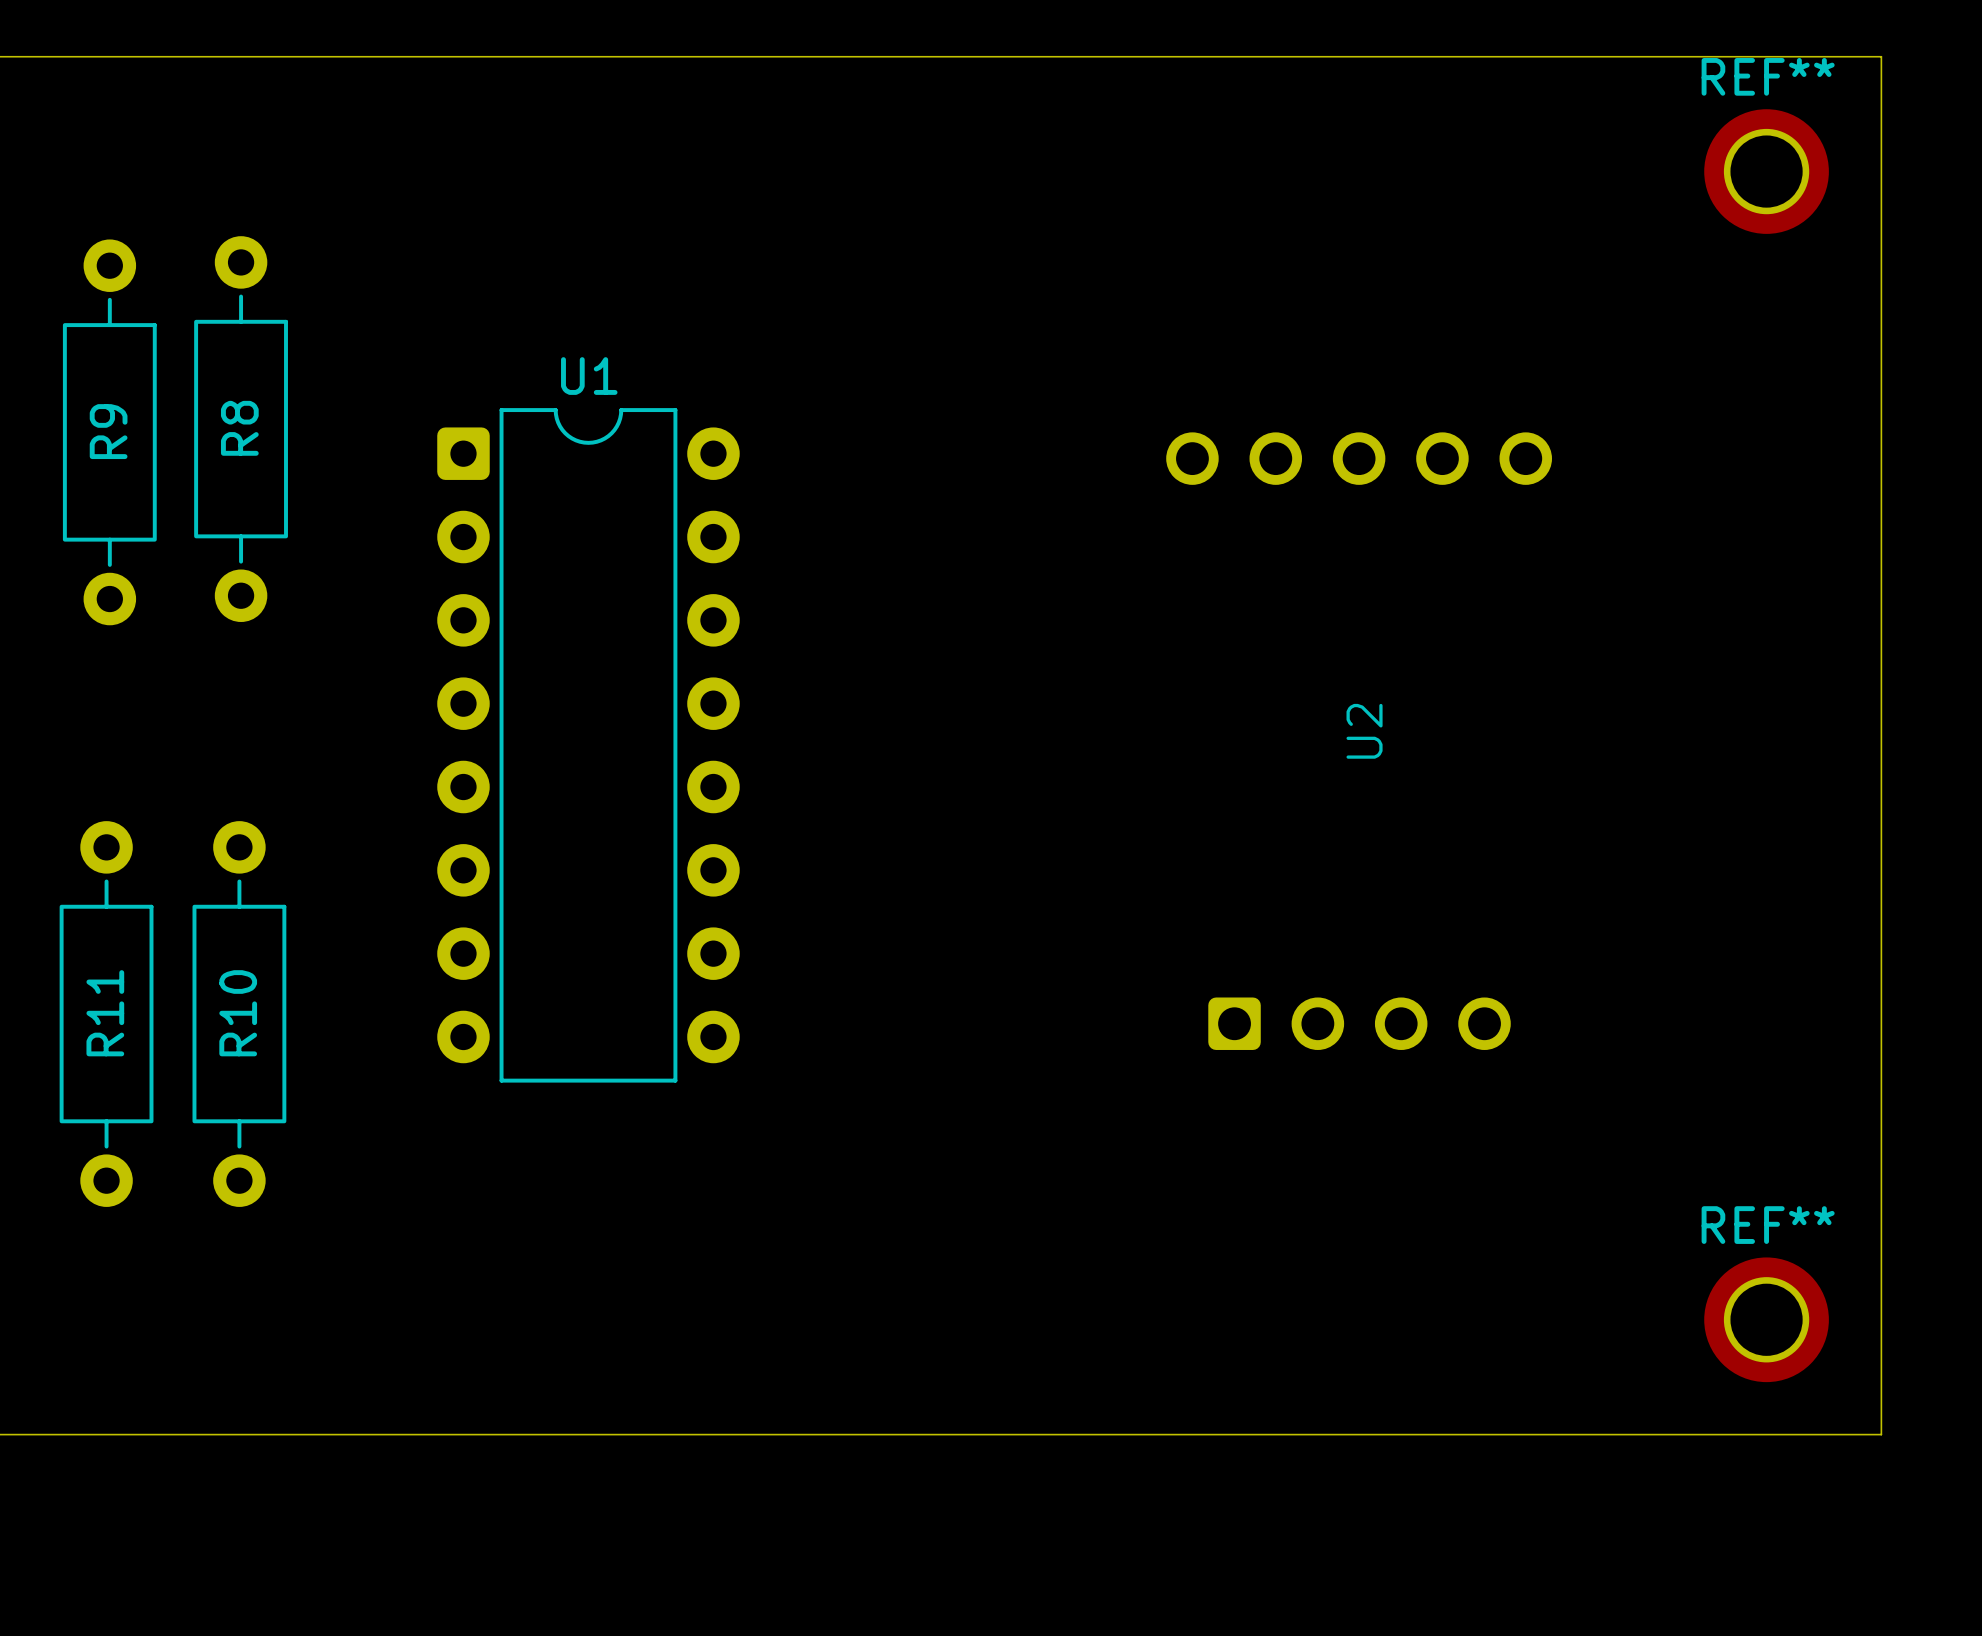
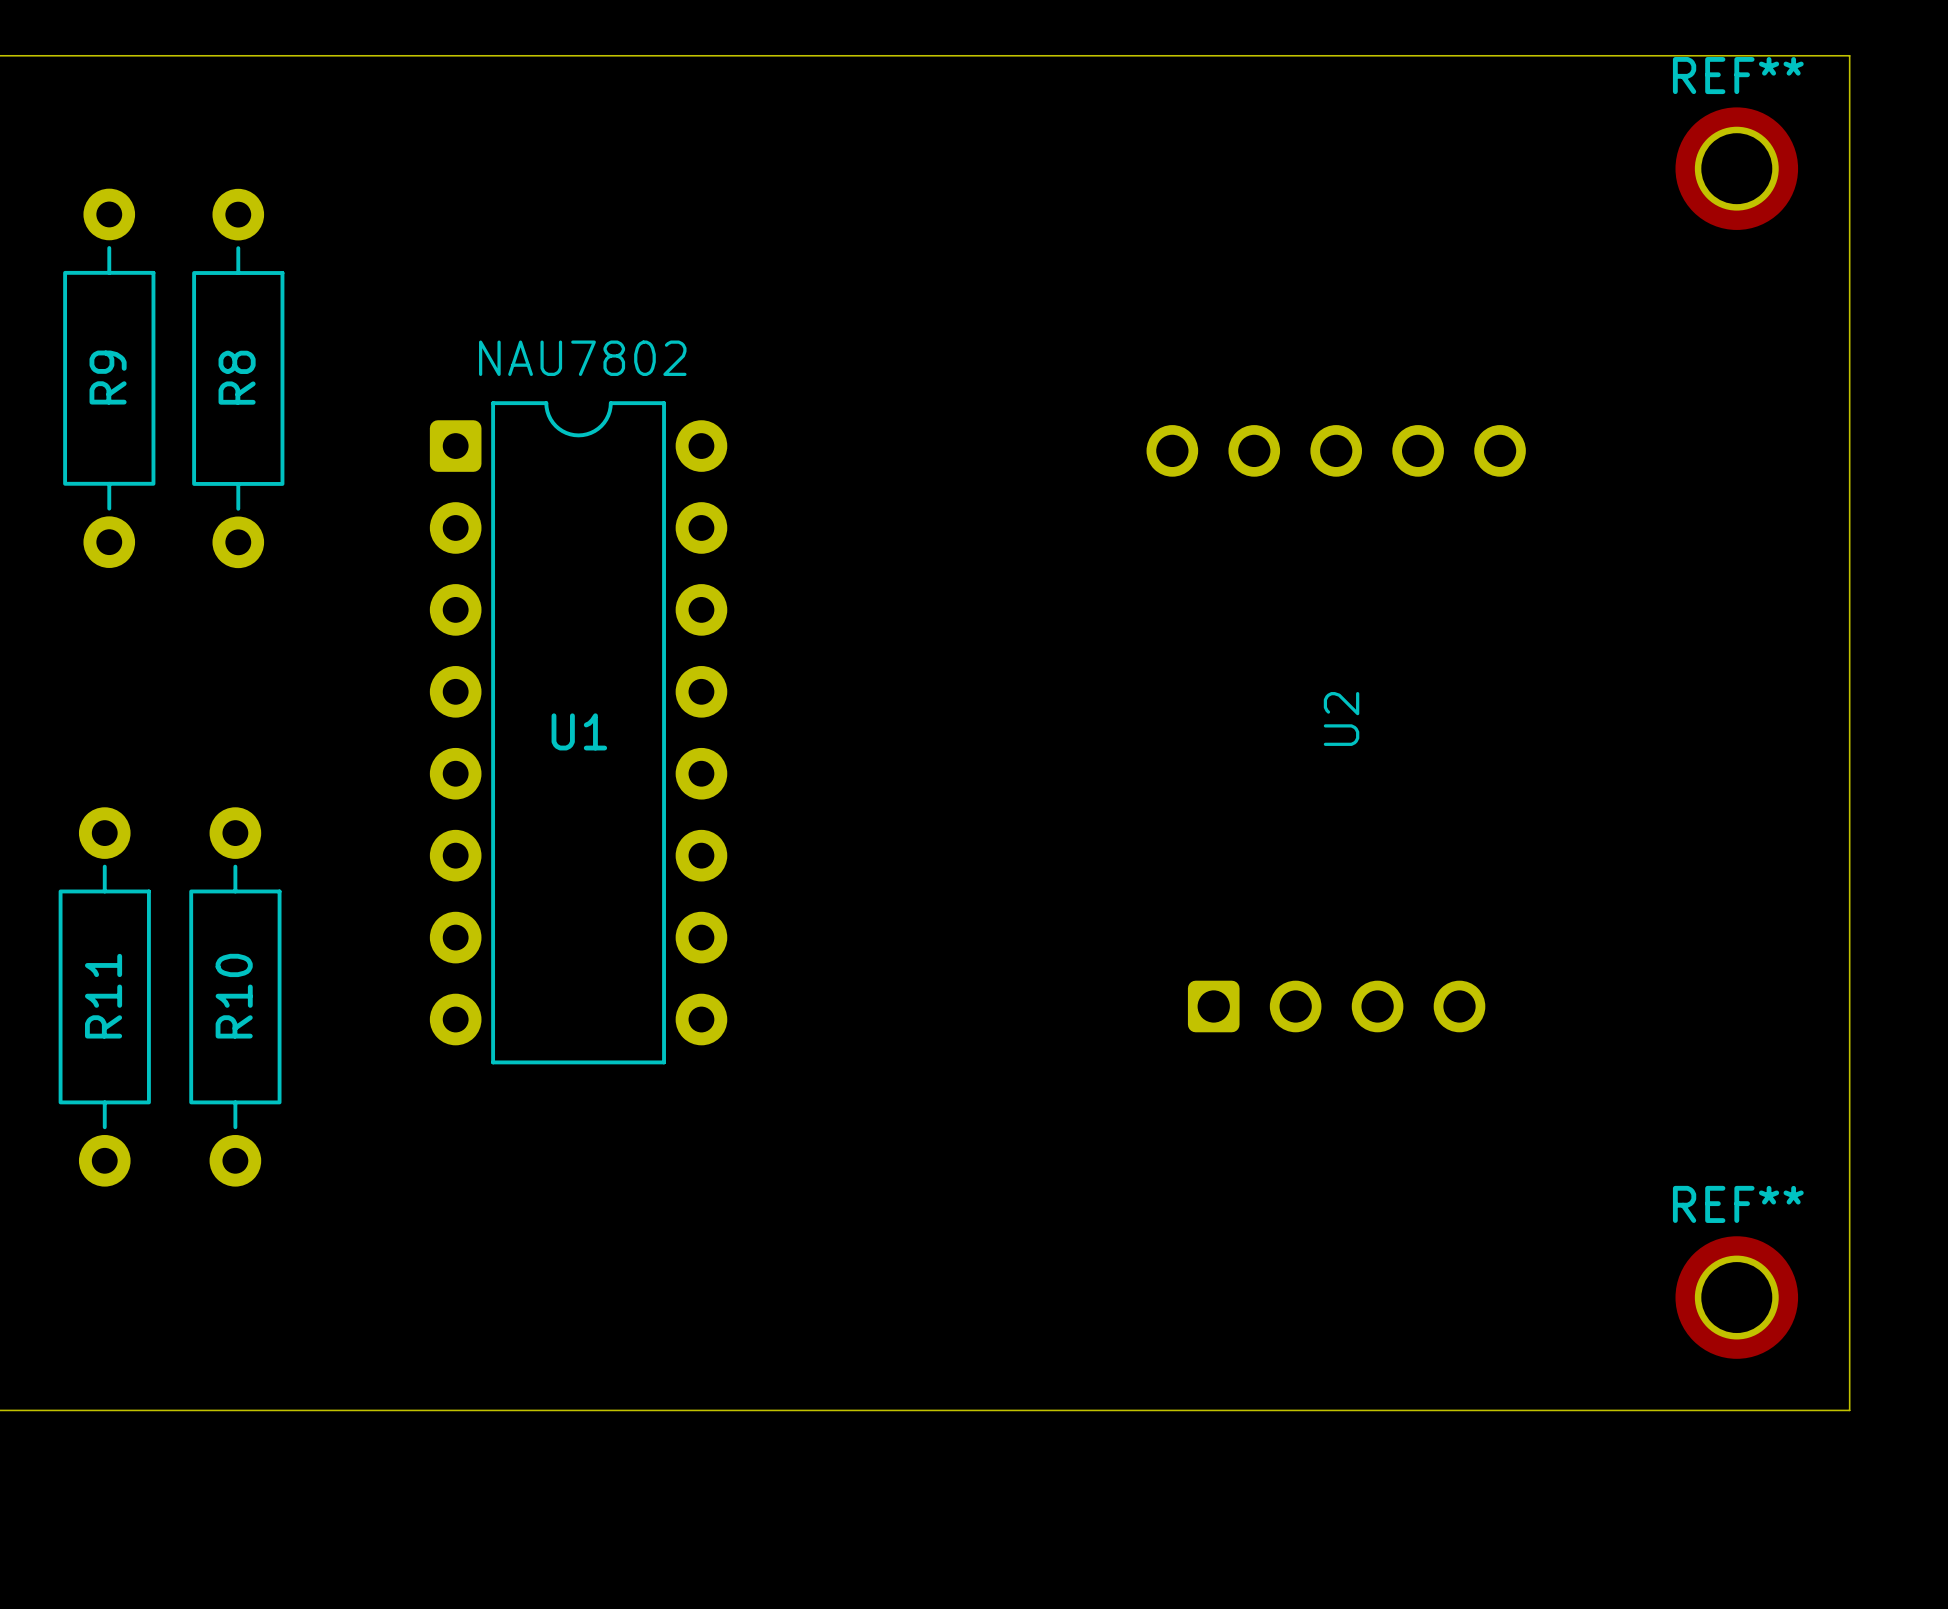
text: none -> NAU7802 (582, 358)
U1 name position: U1 (589, 376) -> U1 (579, 731)
R8 position: (241, 429) -> (238, 378)
R9 position: (109, 432) -> (109, 378)

